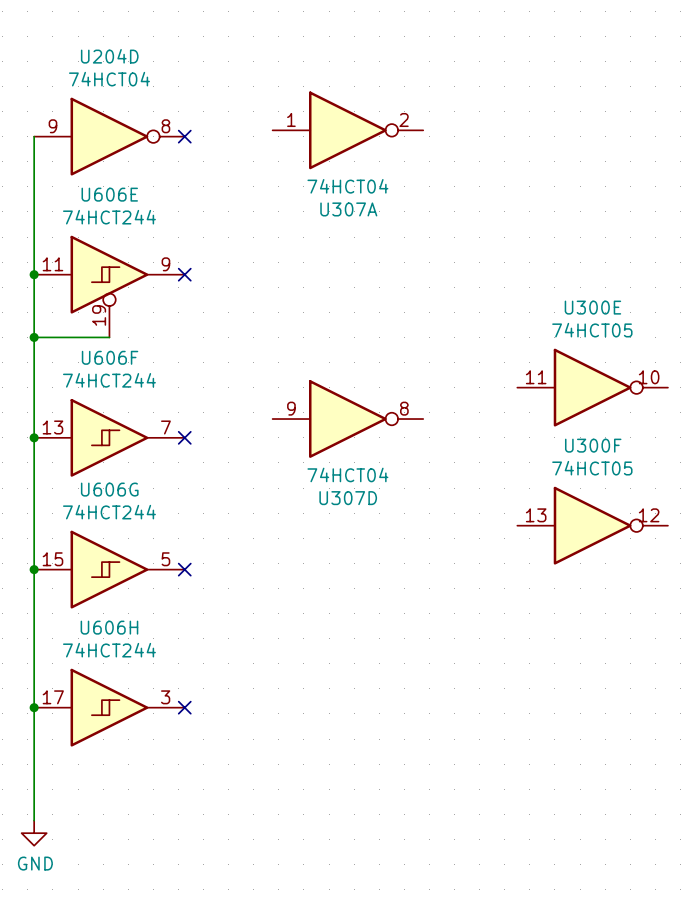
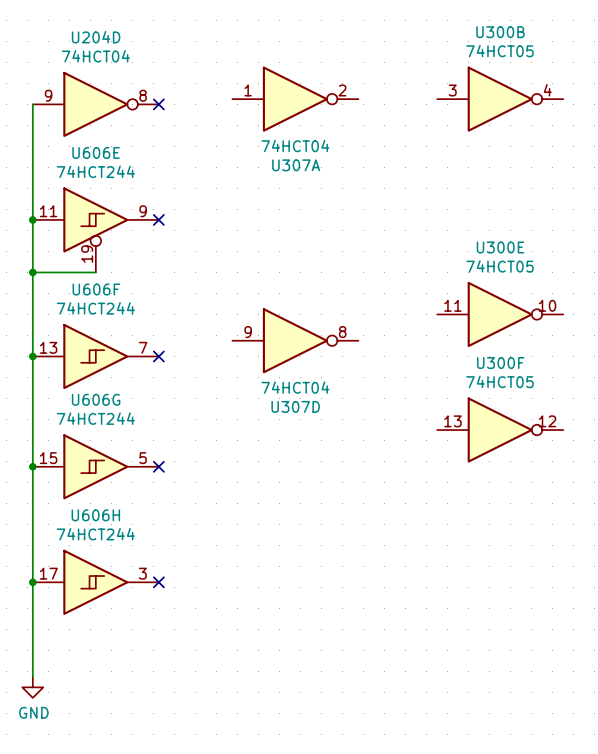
U300B: none -> 74HCT05 (500, 99)

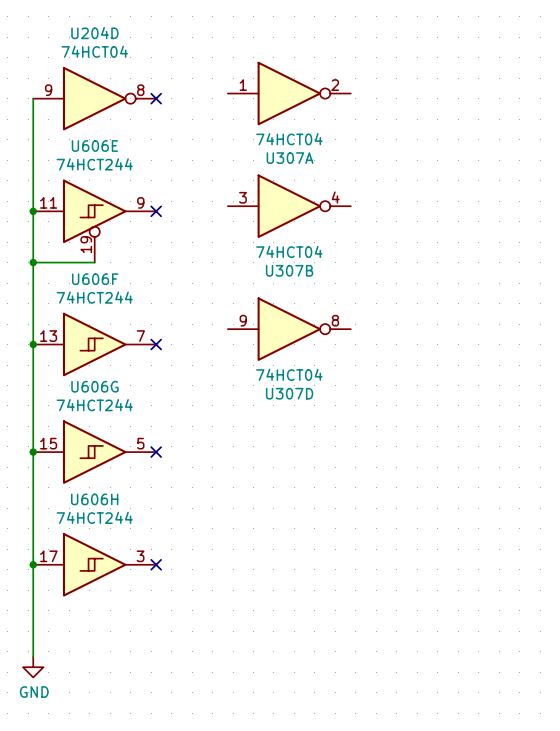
U300B: 74HCT05 (500, 99) -> none
U307B: none -> 74HCT04 (289, 206)
U300E: 74HCT05 (500, 314) -> none
U300F: 74HCT05 (500, 430) -> none

